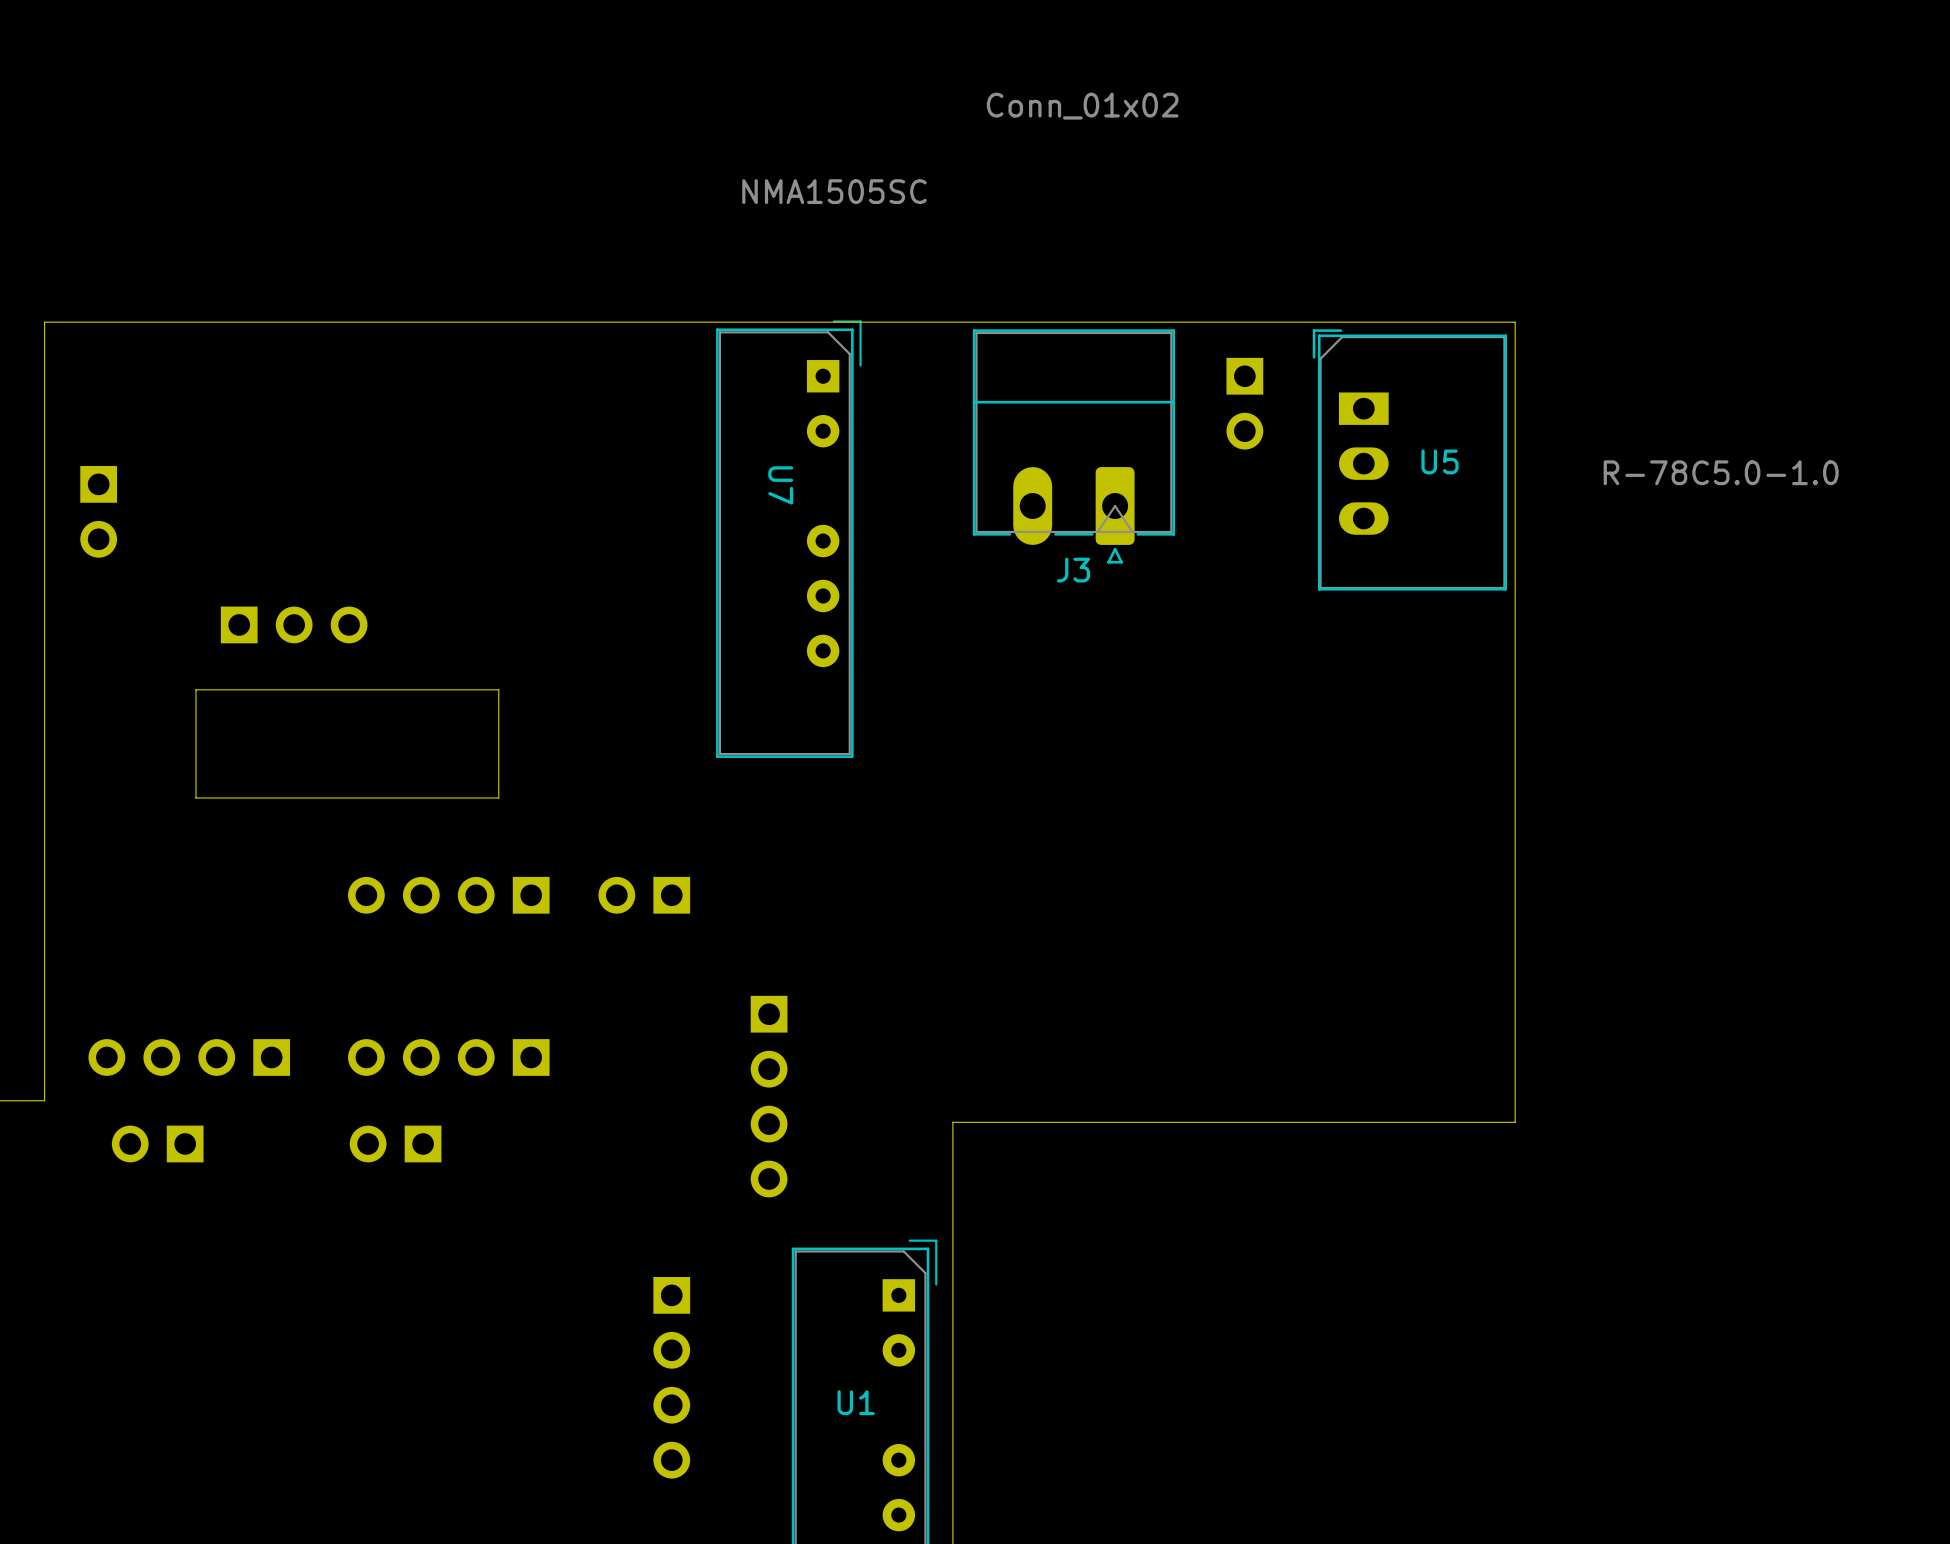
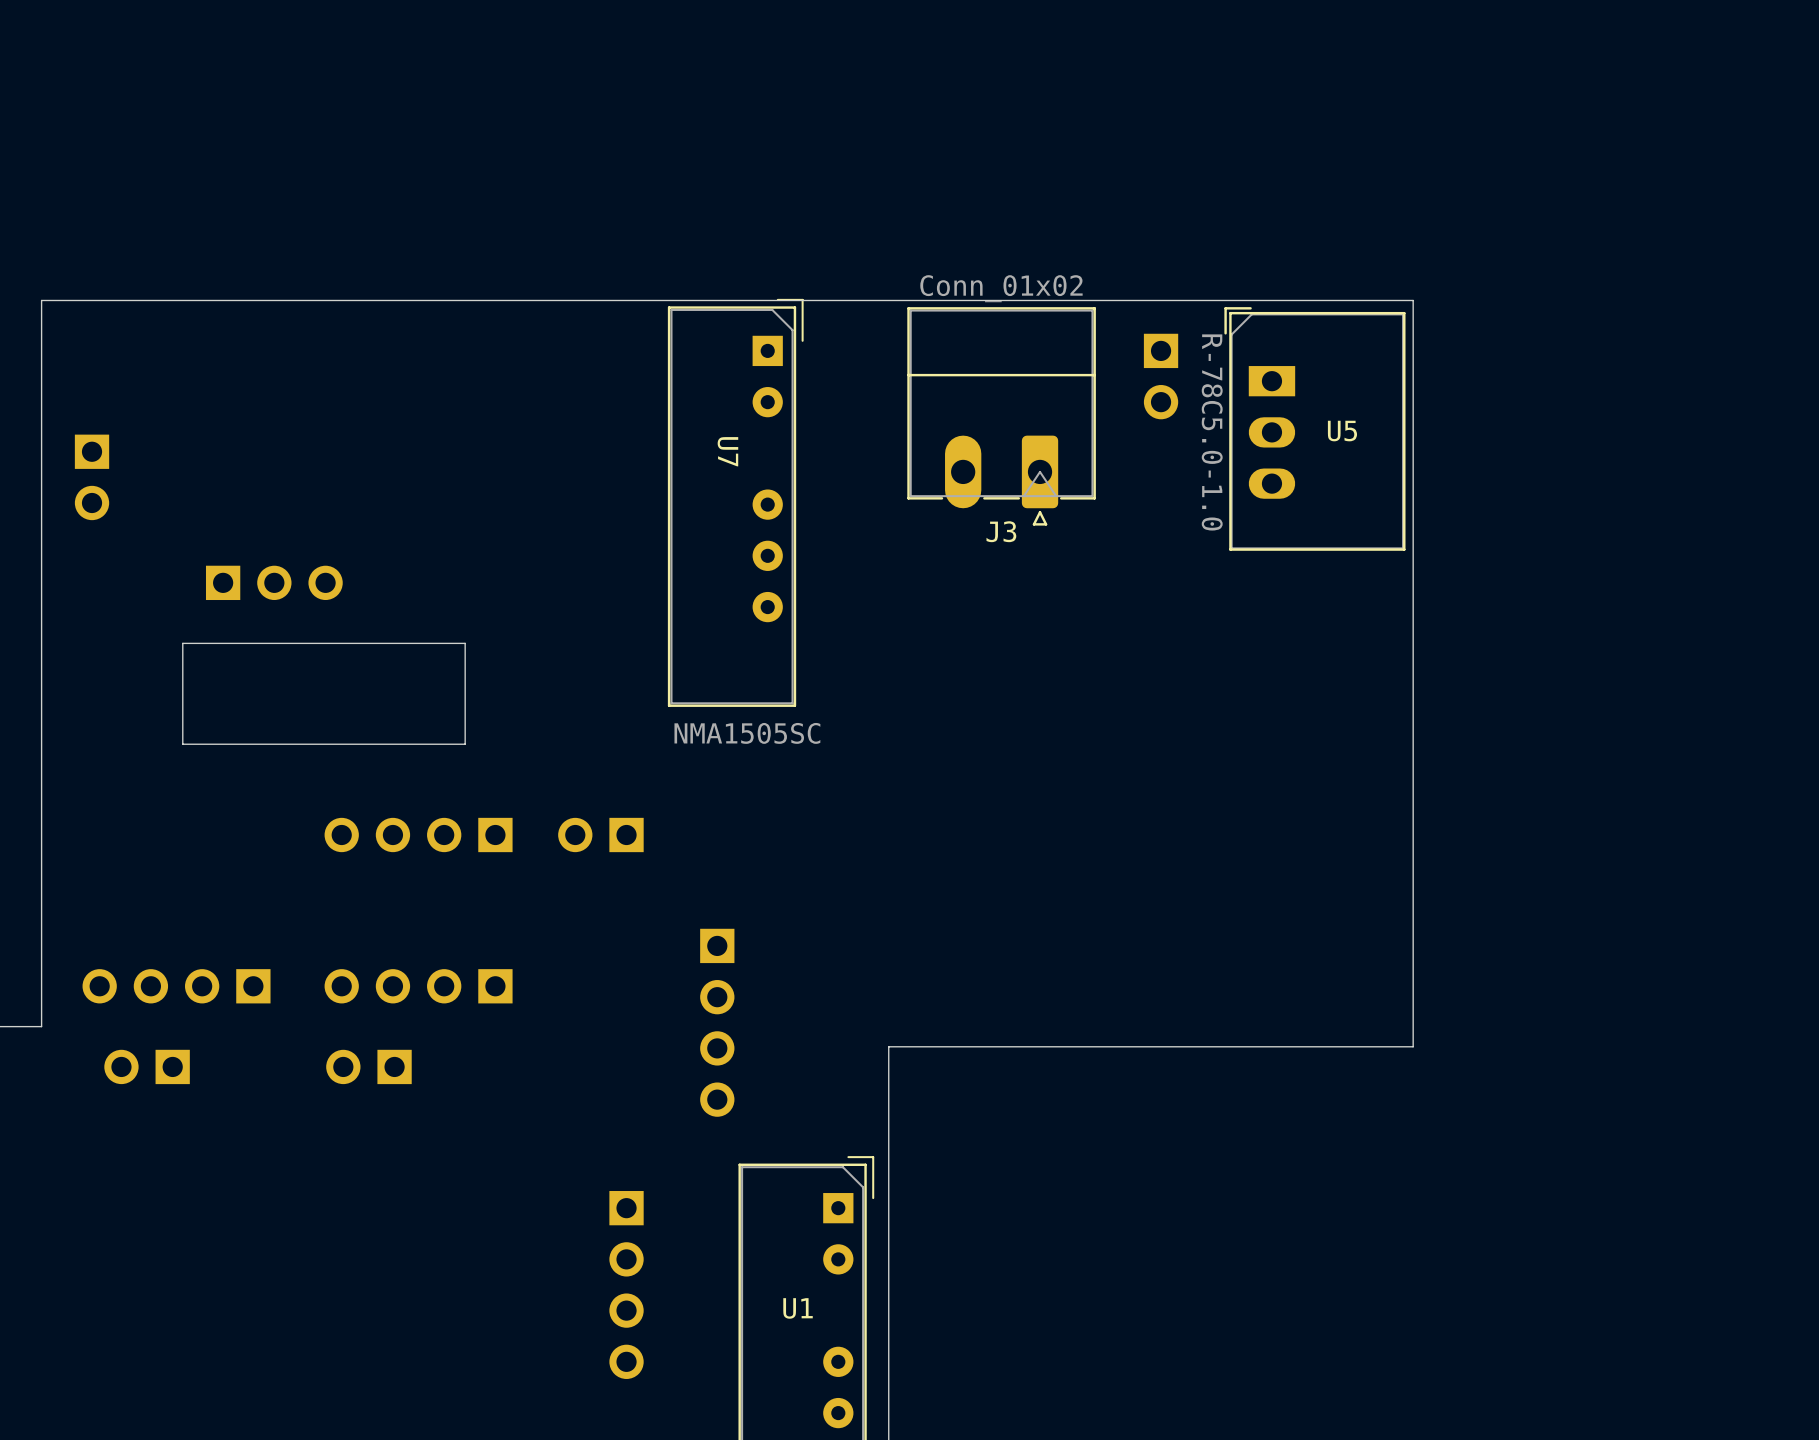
J3 value position: Conn_01x02 (1082, 106) -> Conn_01x02 (1001, 288)
U7 value position: NMA1505SC (834, 191) -> NMA1505SC (747, 733)
U5 value rotation: 0° (1721, 472) -> 90° clockwise (1212, 432)
U5 value position: R-78C5.0-1.0 (1721, 472) -> R-78C5.0-1.0 (1212, 432)

